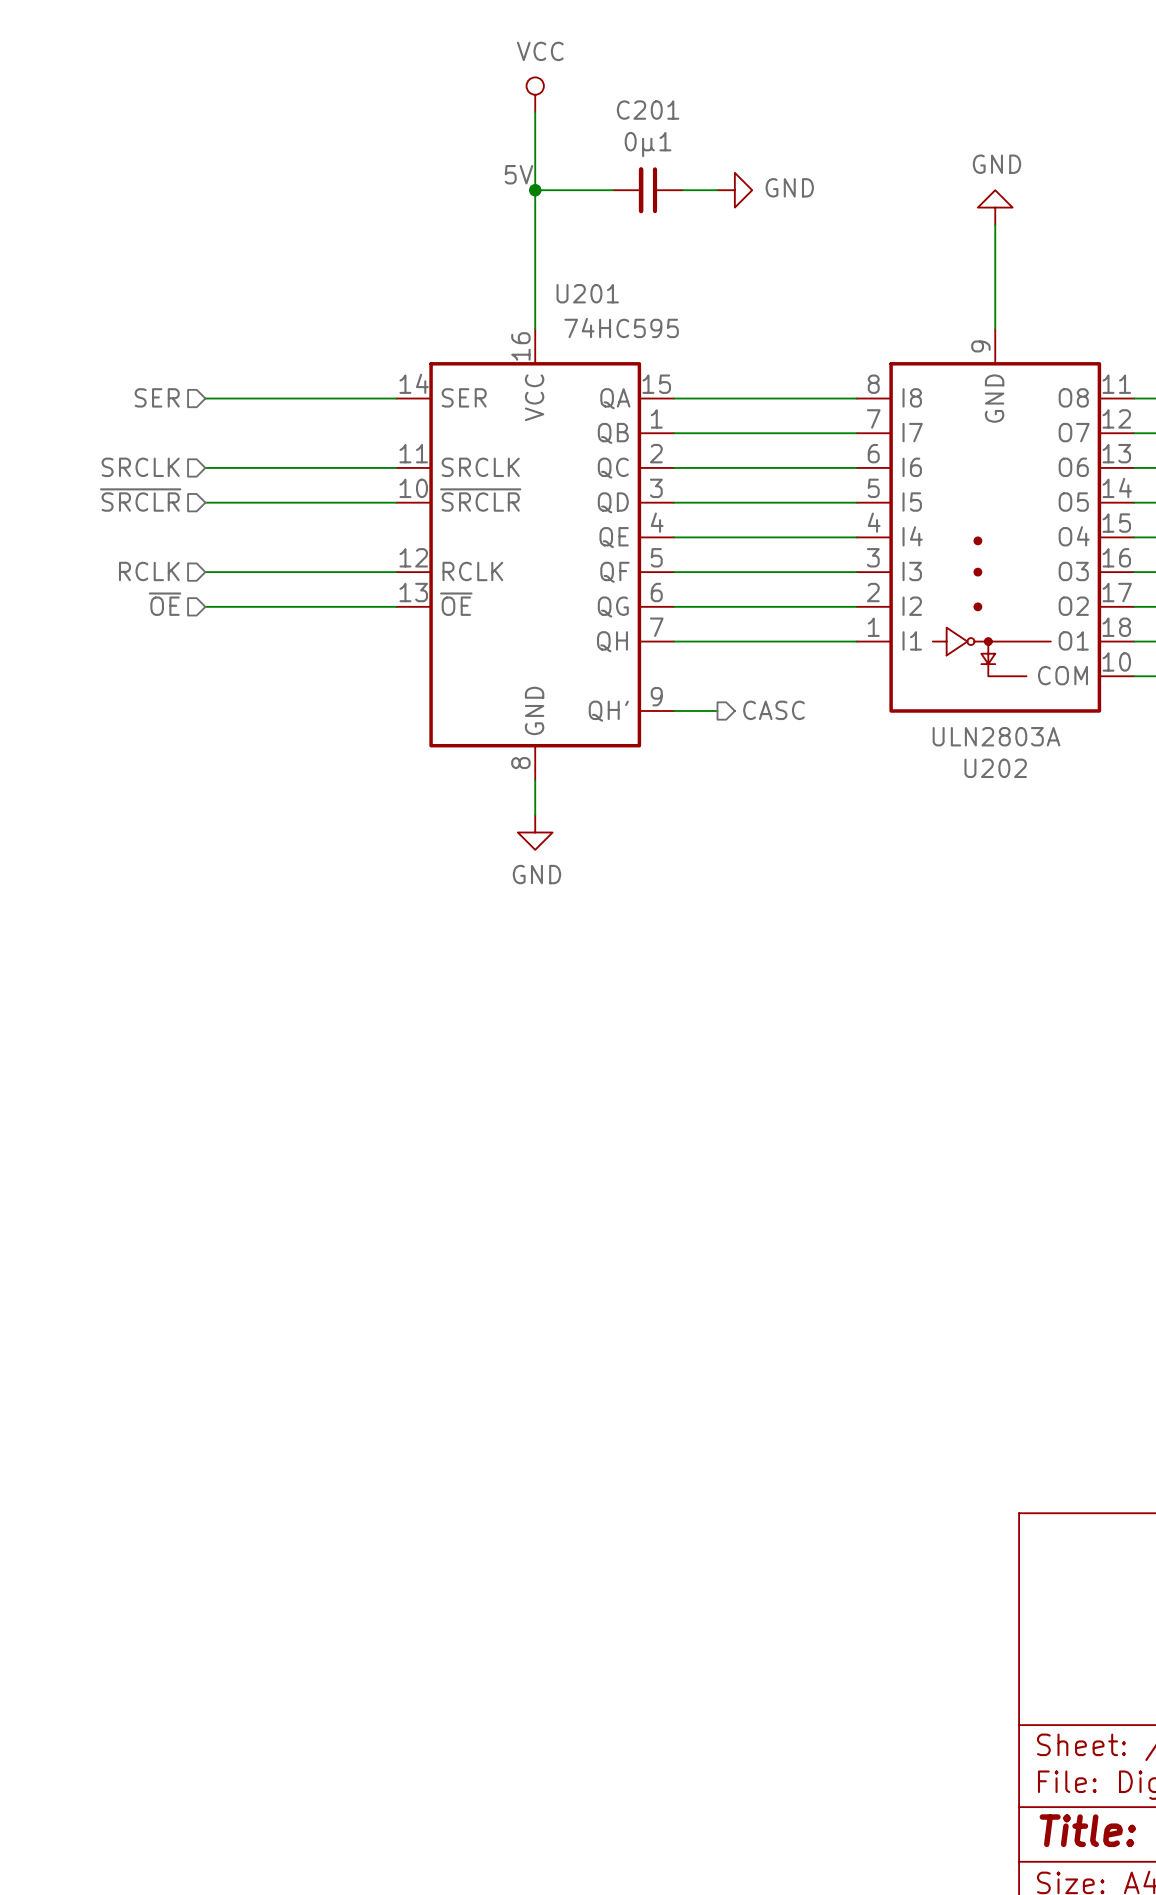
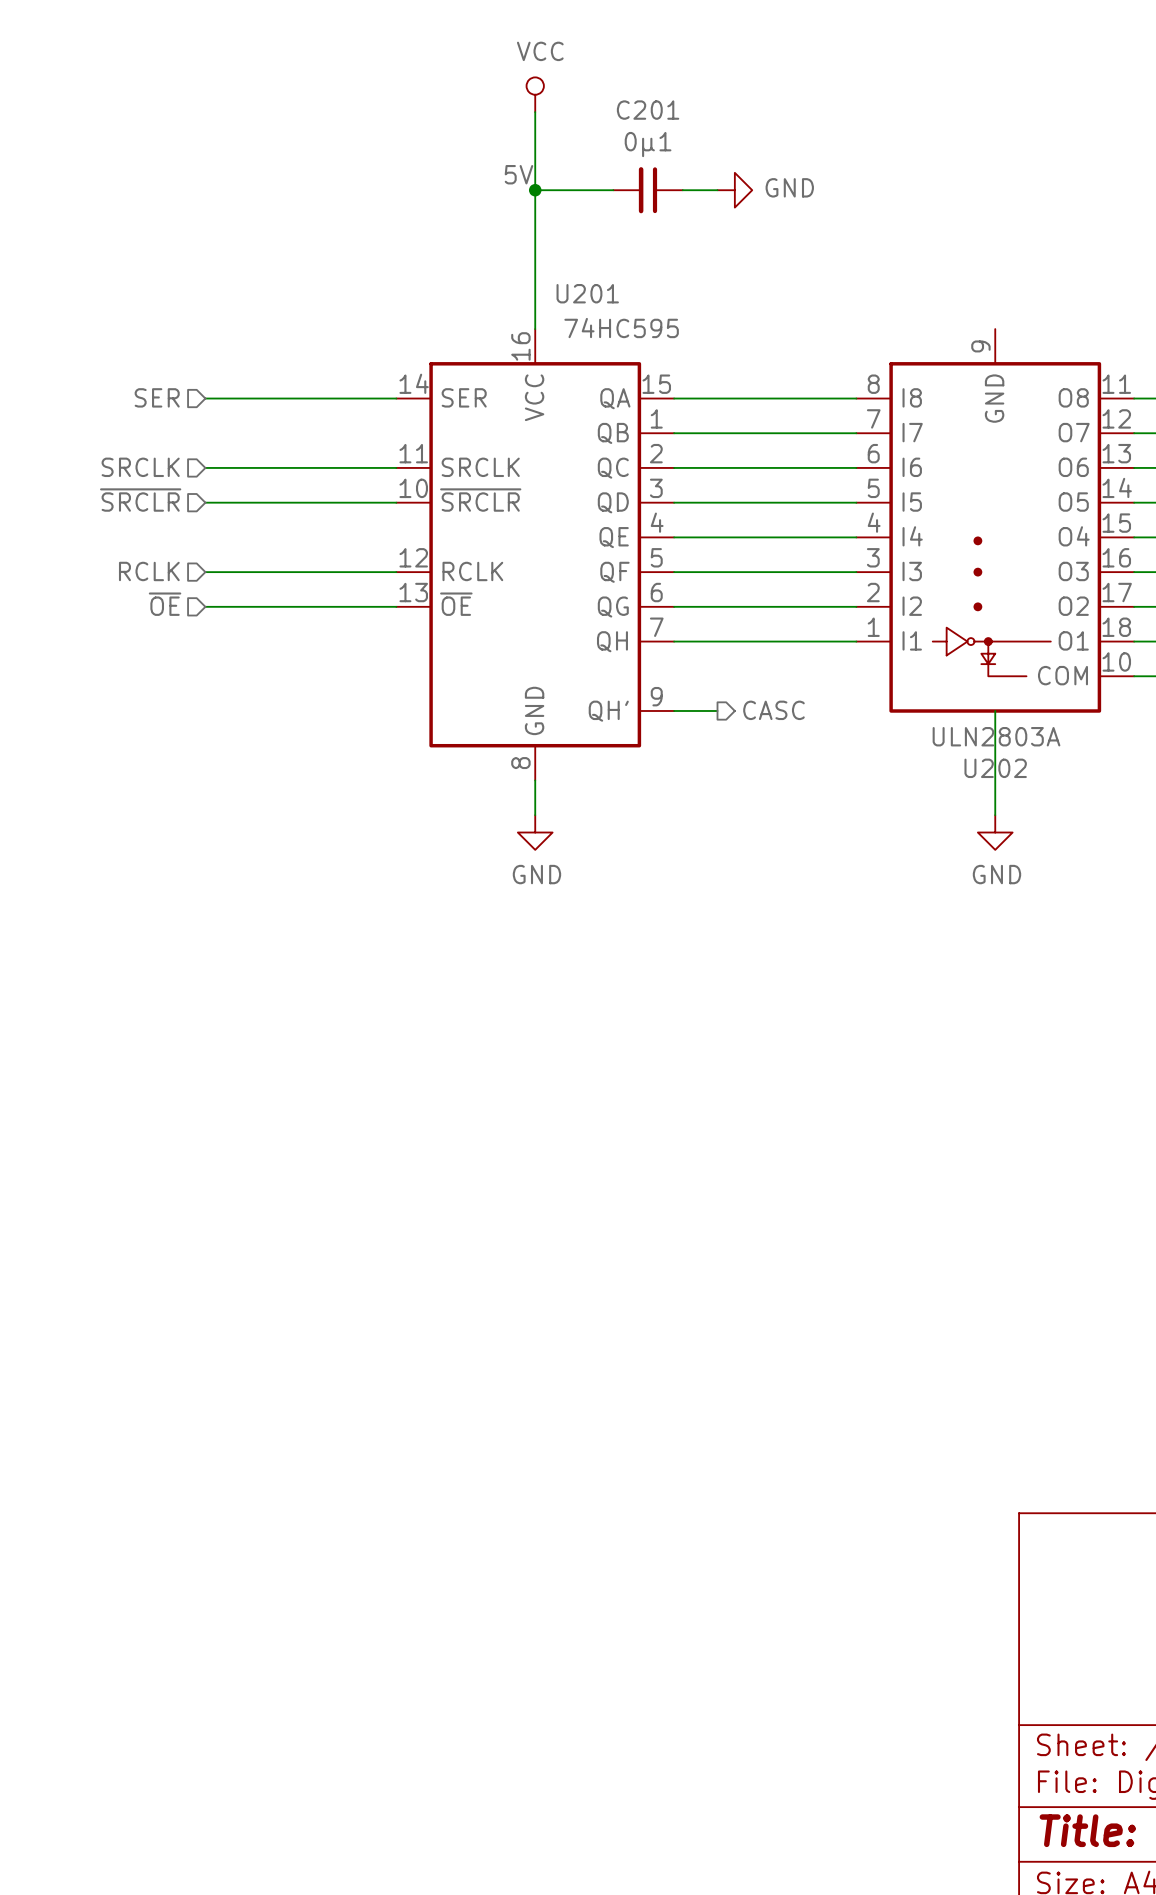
power symbol: GND (995, 207) -> none
wire: (995, 224) (995, 329) -> none
wire: none -> (995, 710) (995, 815)
power symbol: none -> GND (995, 832)

